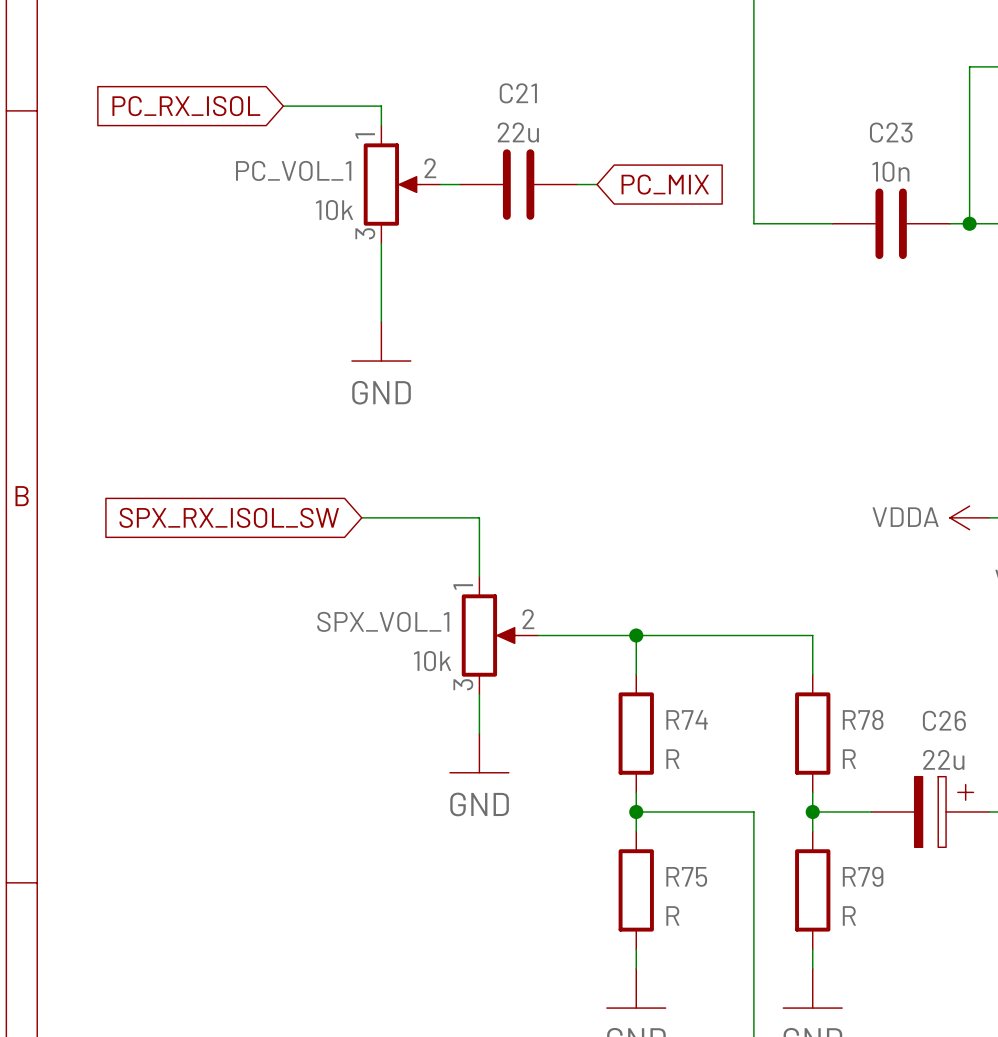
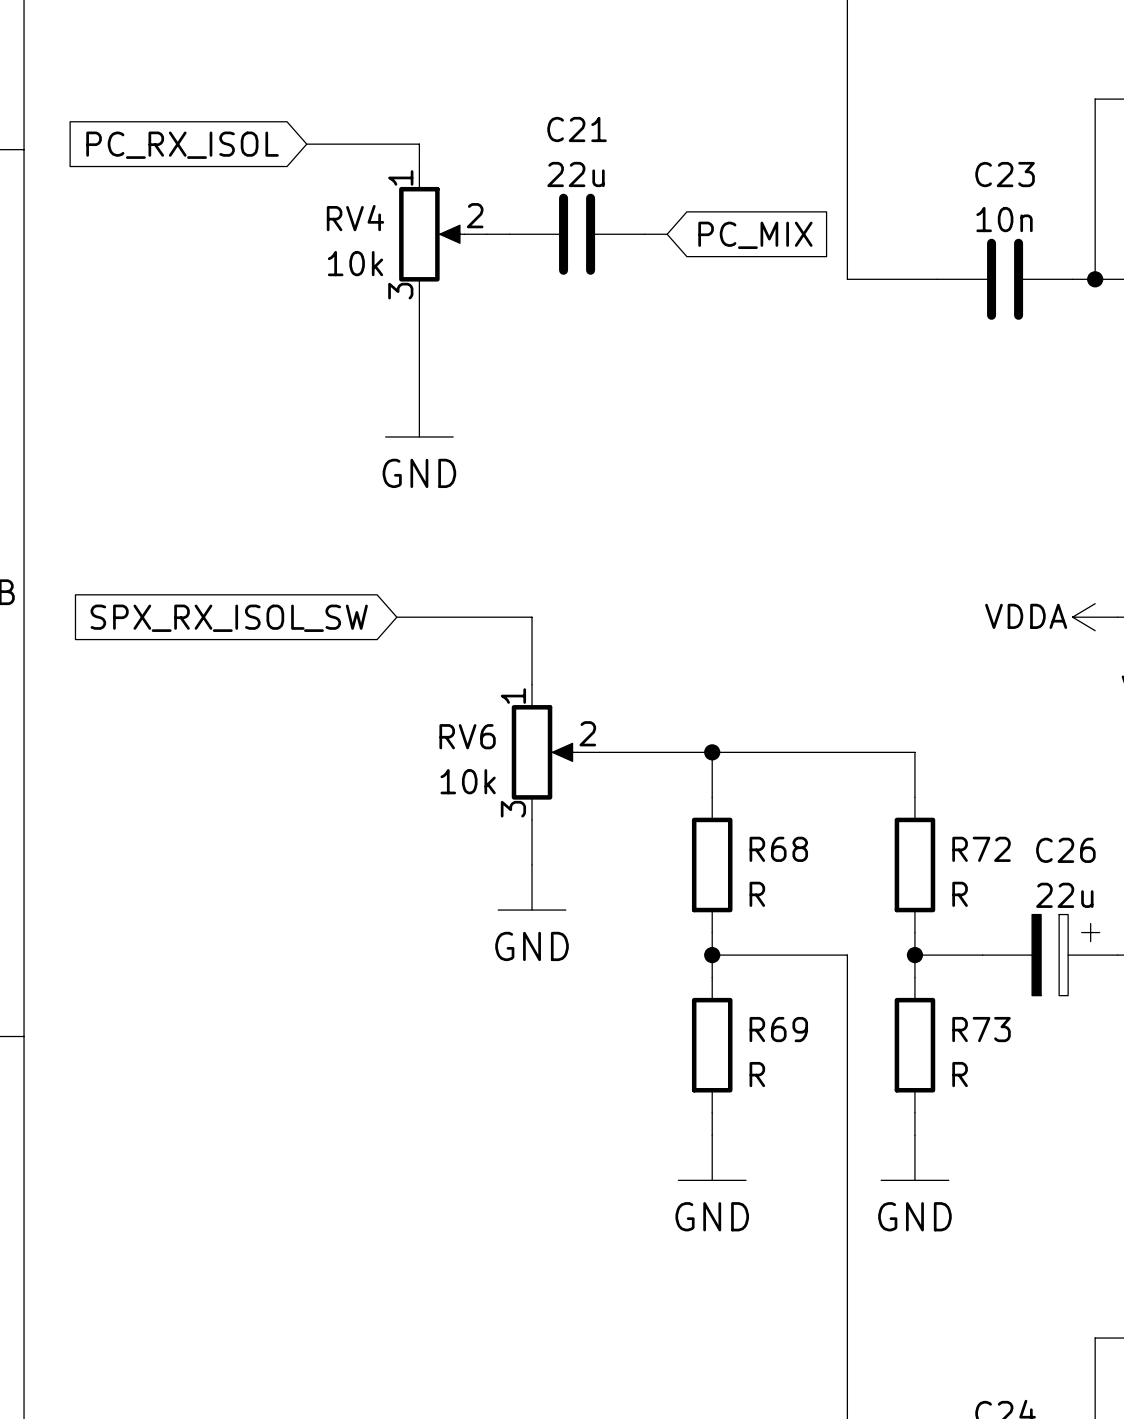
PC_VOL_1 name: PC_VOL_1 (293, 170) -> RV4 (355, 218)
SPX_VOL_1 name: SPX_VOL_1 (383, 621) -> RV6 (467, 736)
R74 name: R74 (687, 719) -> R68 (778, 849)
R78 name: R78 (863, 719) -> R72 (981, 849)
R75 name: R75 (686, 876) -> R69 (778, 1029)
R79 name: R79 (863, 876) -> R73 (981, 1029)

